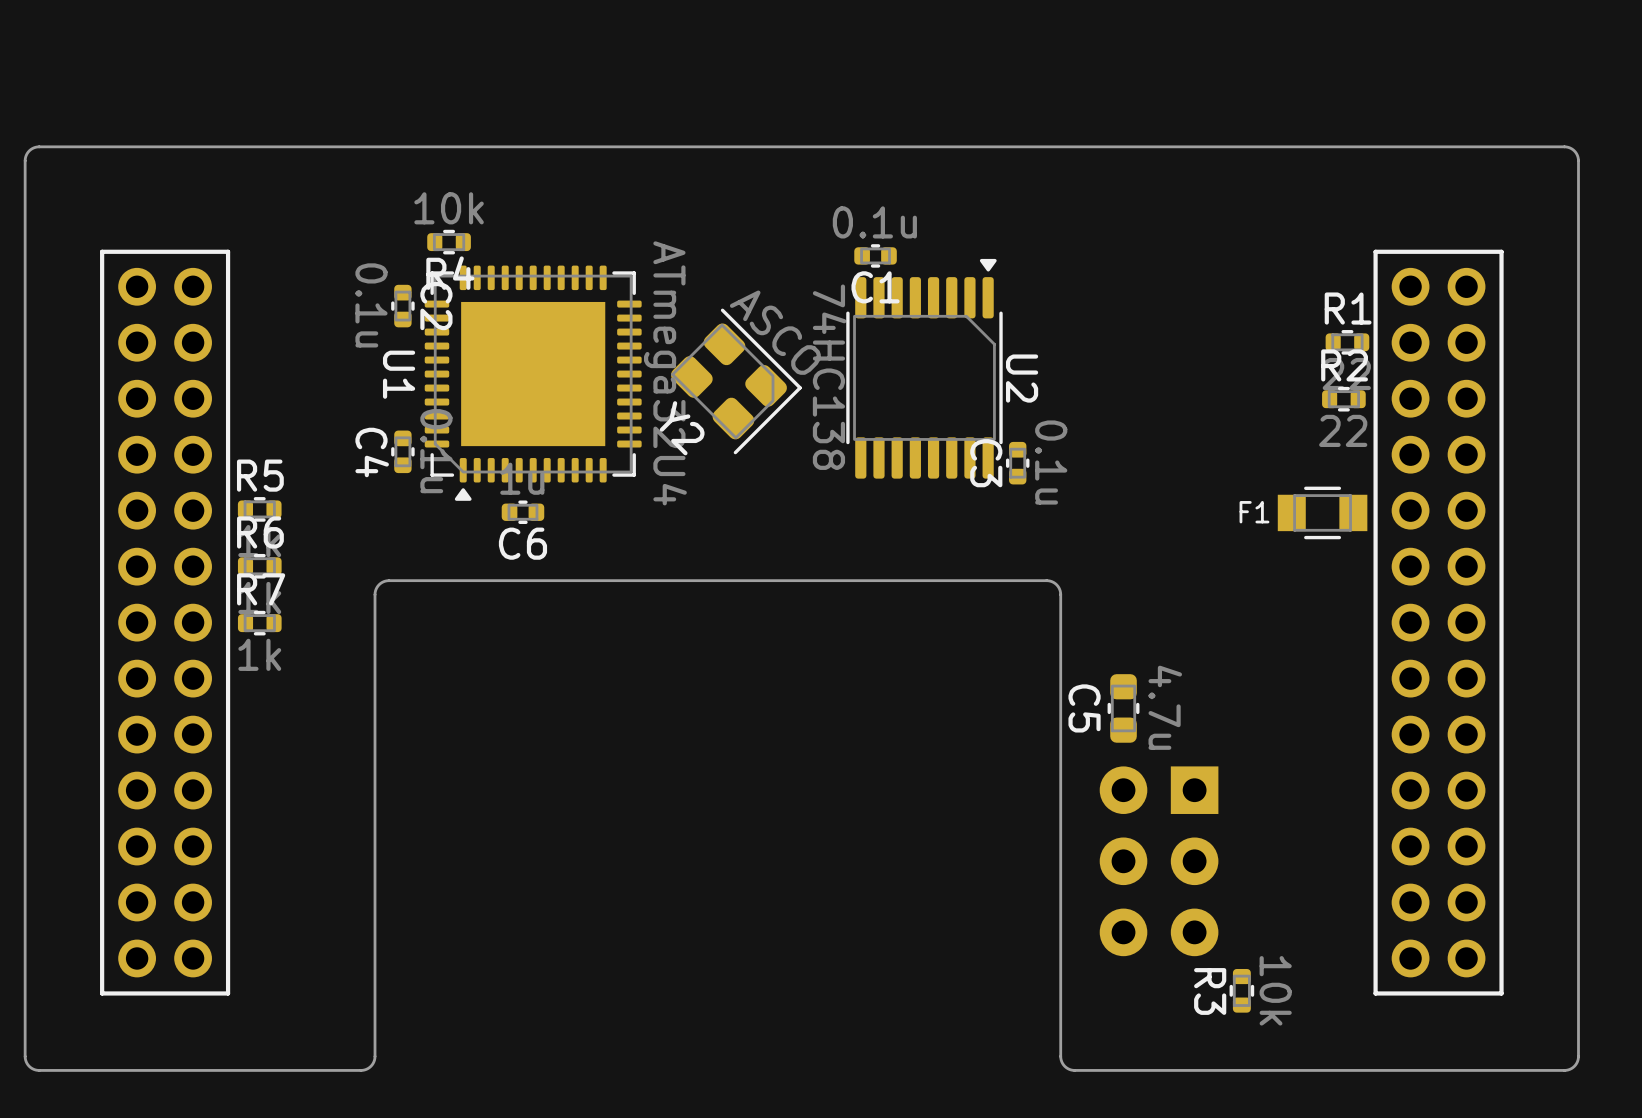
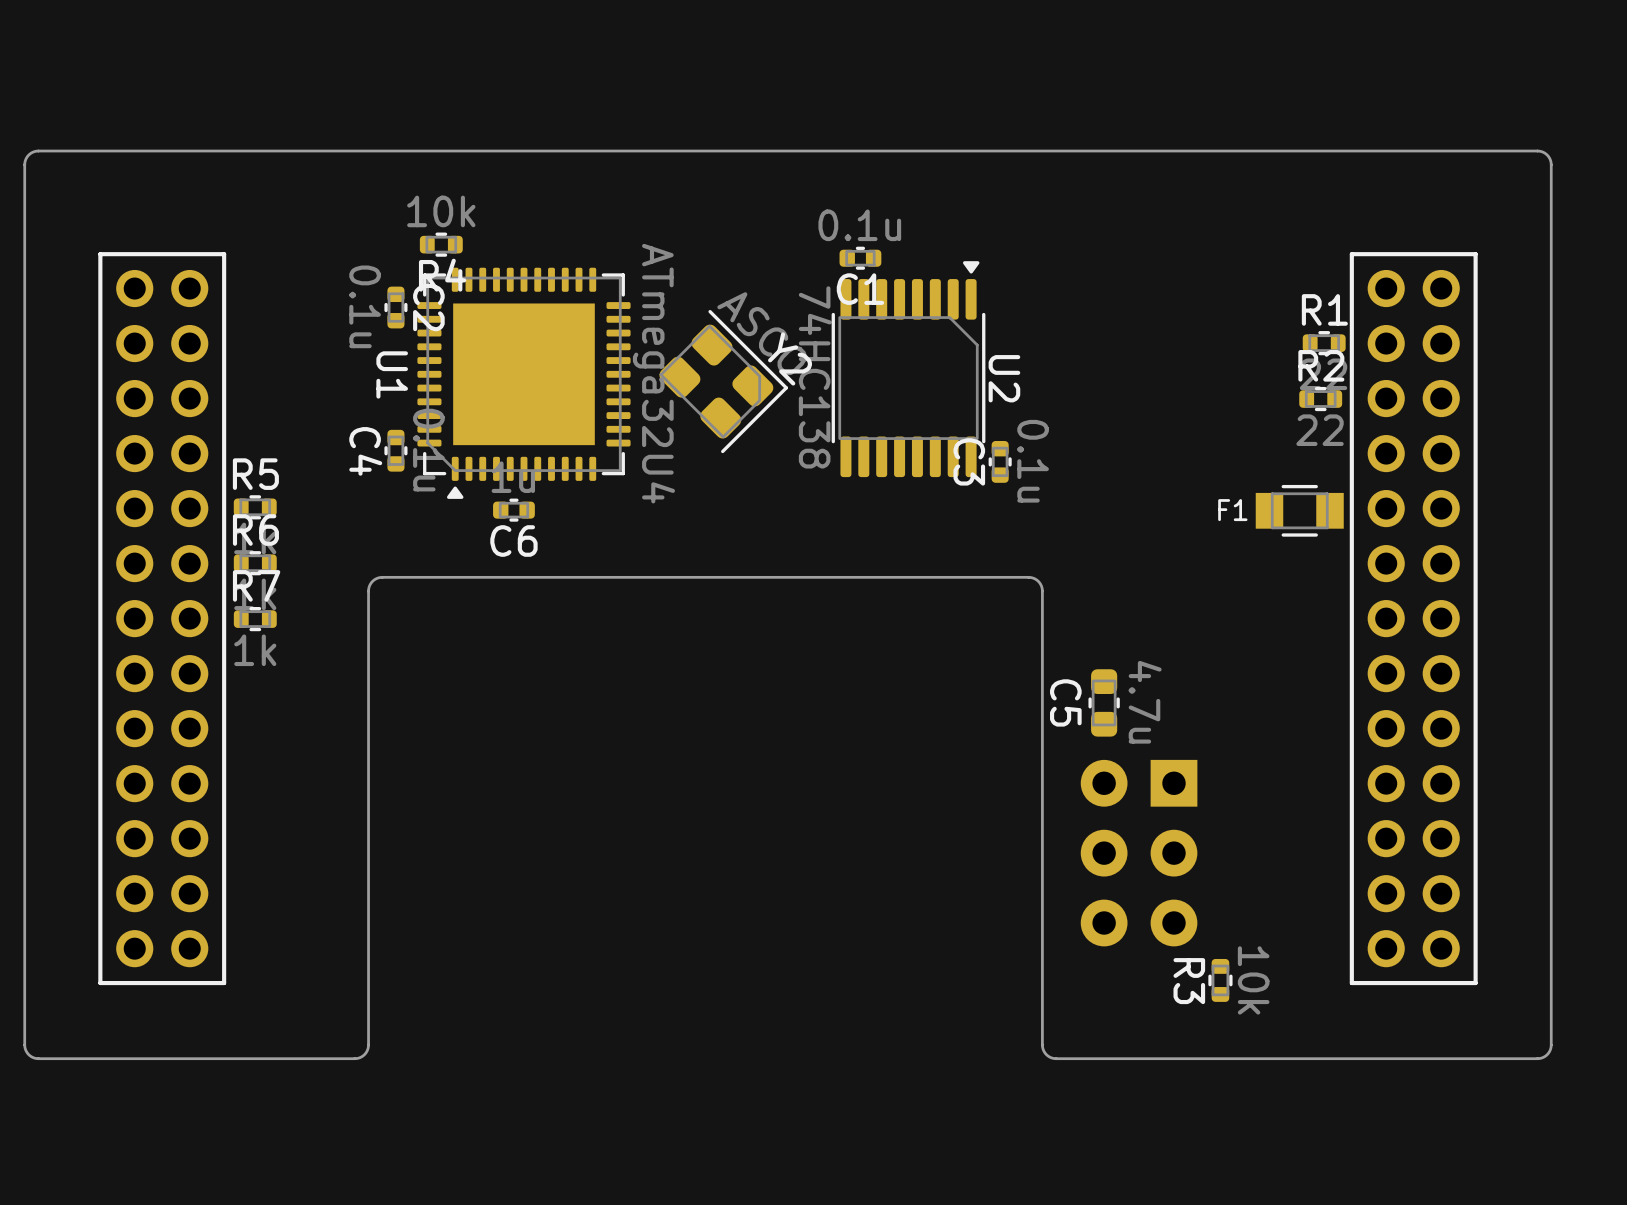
Y2 name position: Y2 (682, 428) -> Y2 (790, 358)

